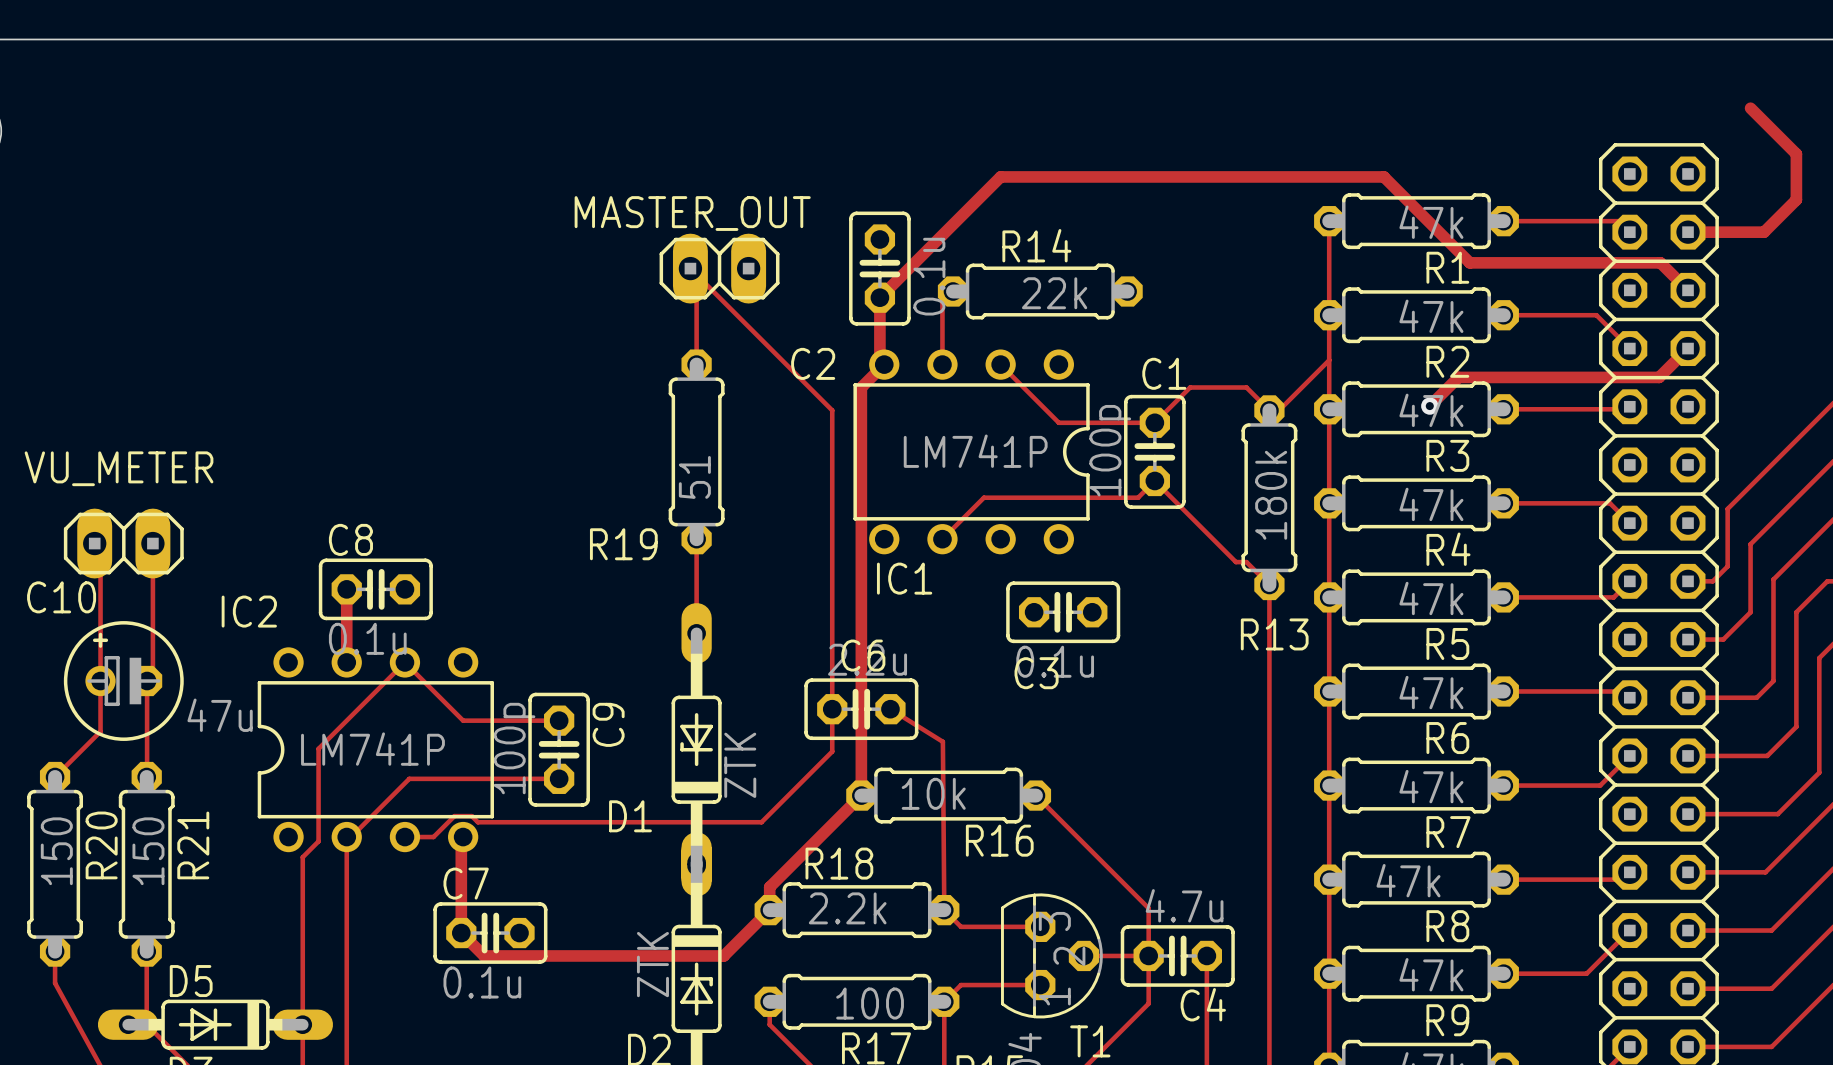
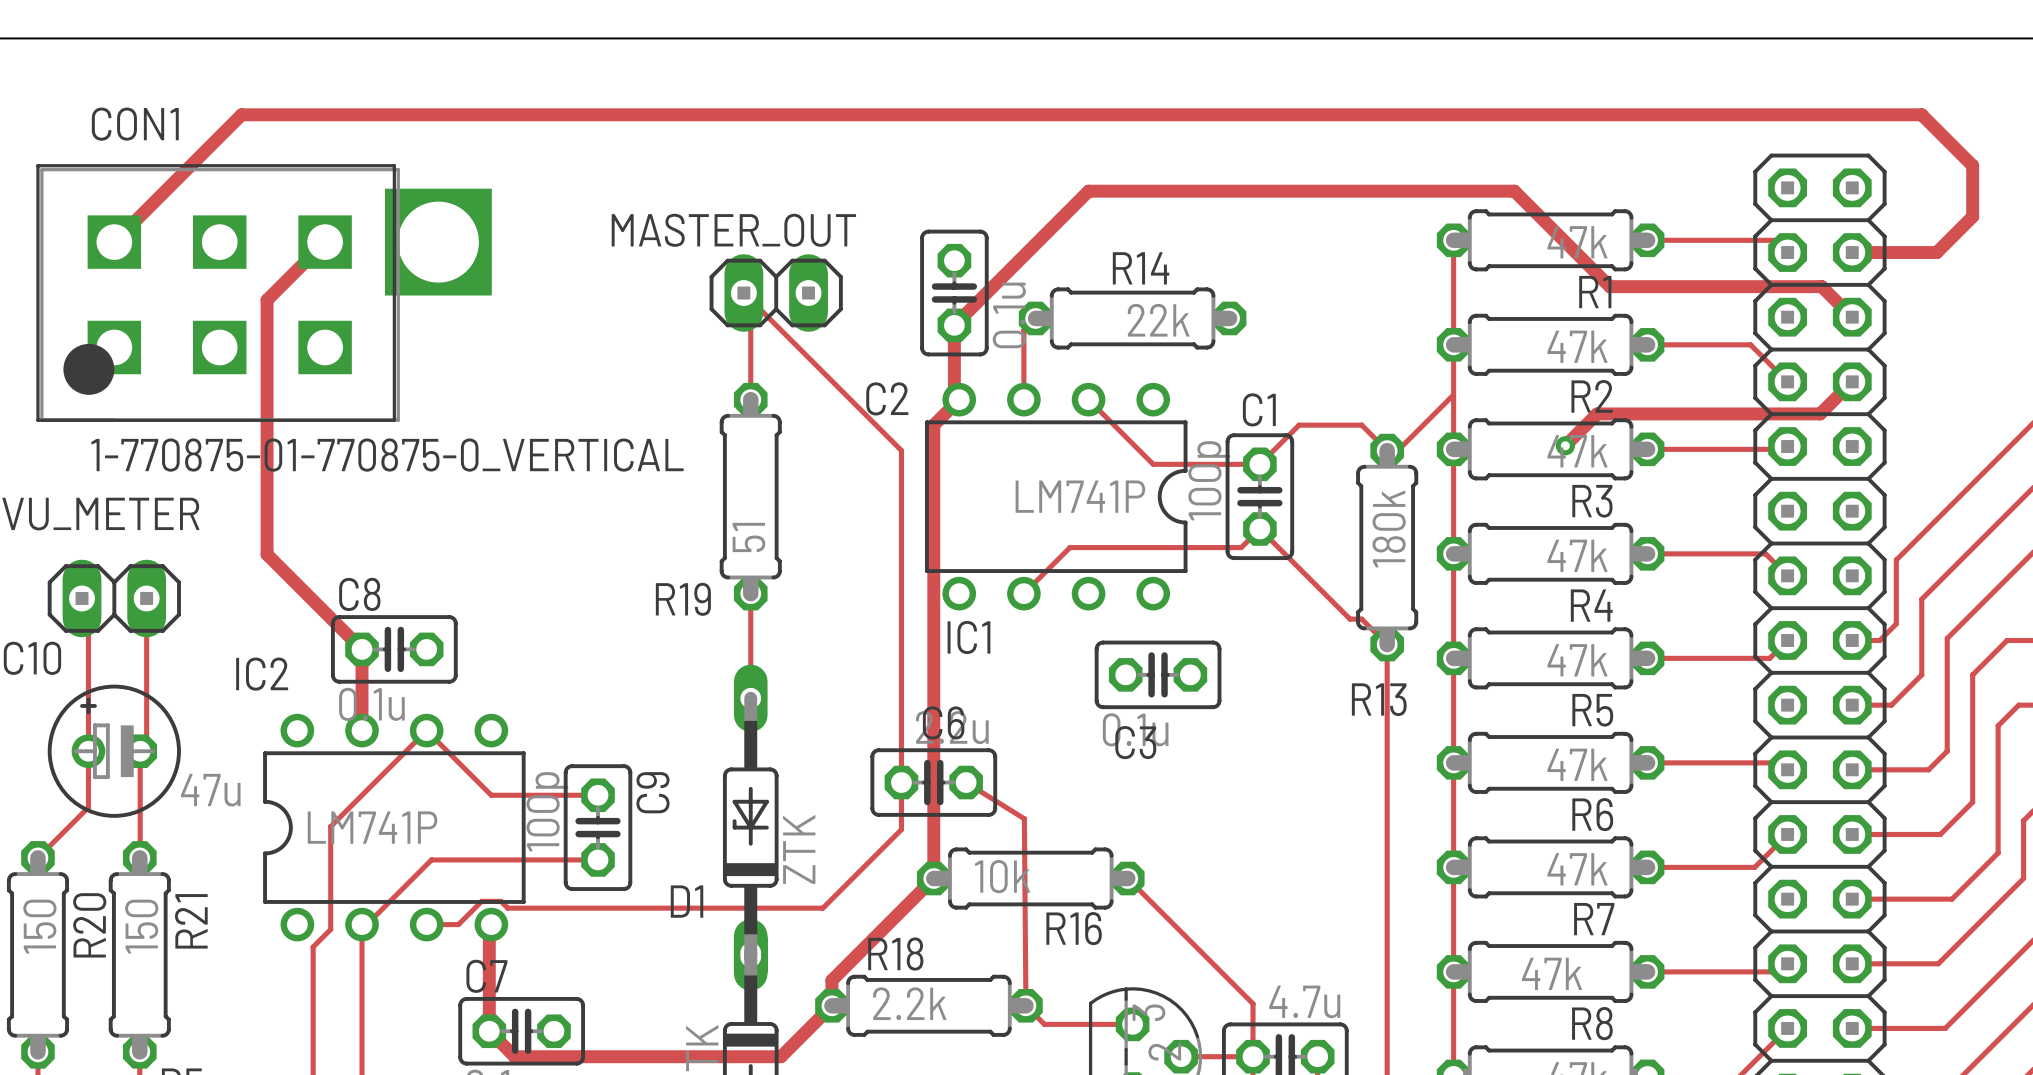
track: none -> (1921, 114) (241, 114) (114, 242)
track: none -> (325, 242) (267, 300) (267, 554) (362, 649)
CON1: none -> 1-770875-01-770875-0_VERTICAL (264, 293)

